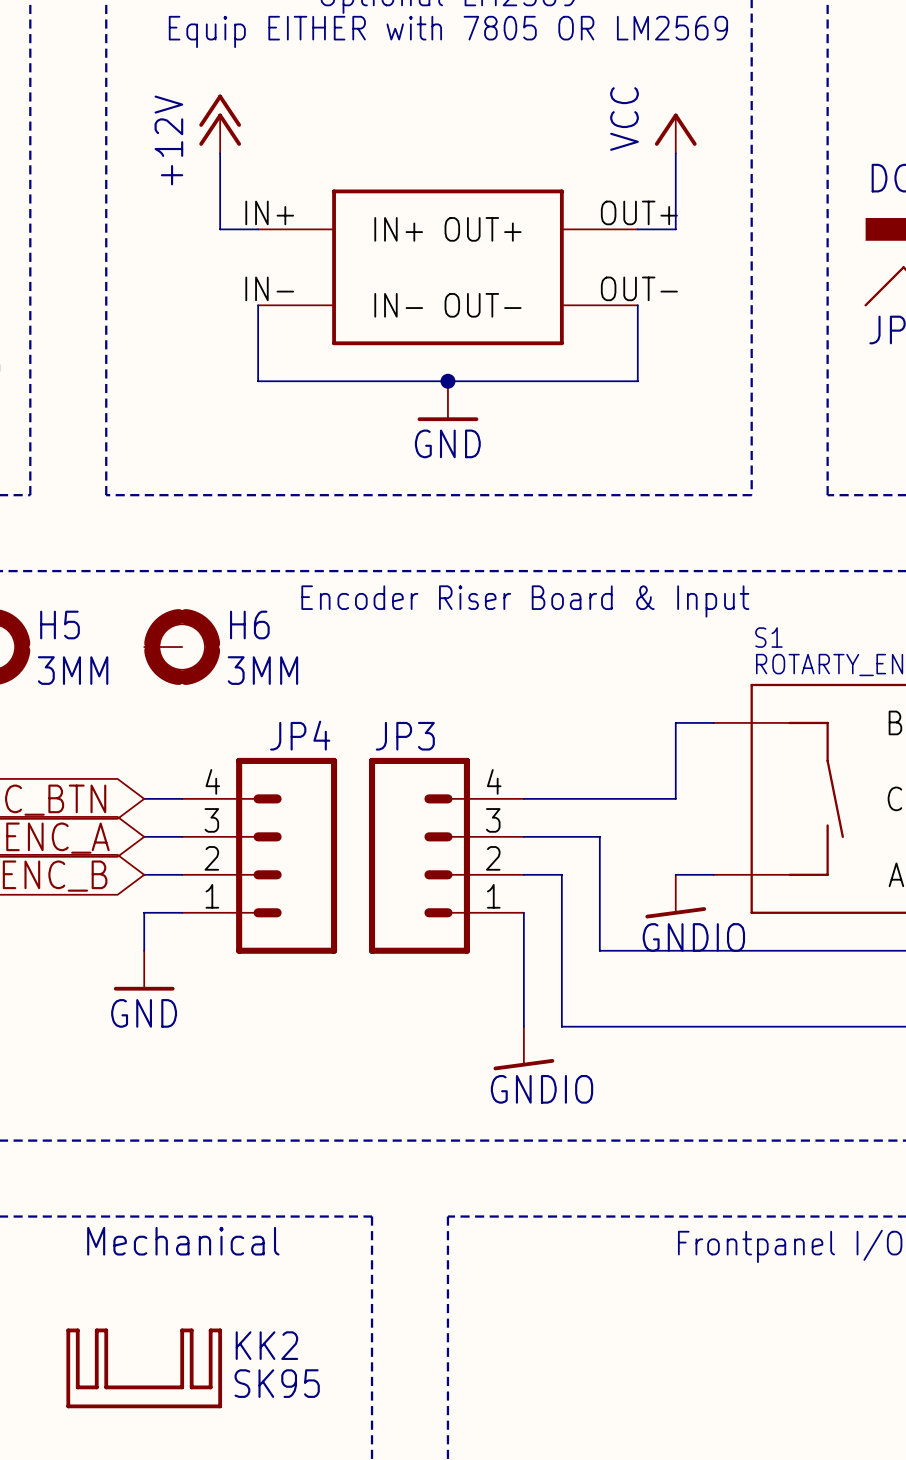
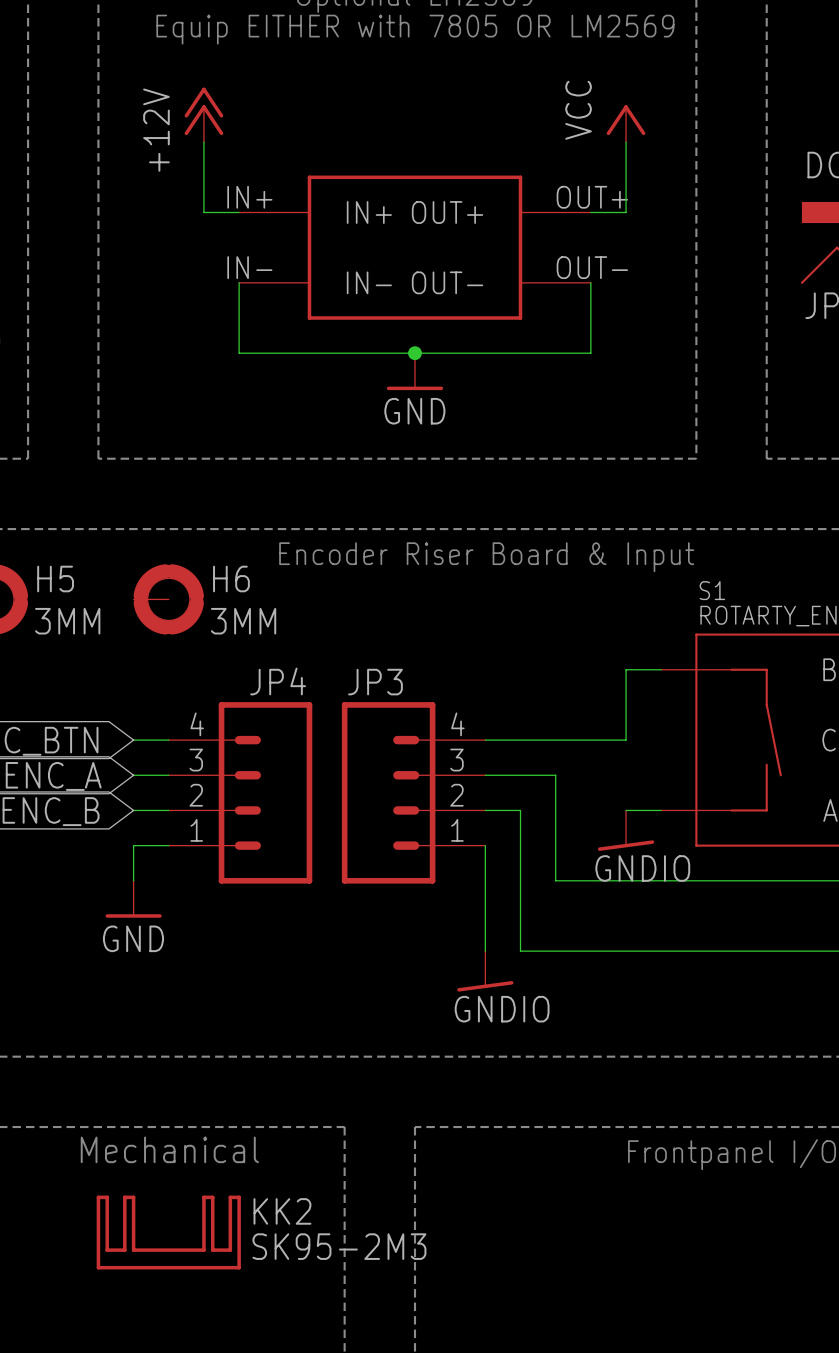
KK2 position: (144, 1368) -> (168, 1232)
KK2 value: SK95 (277, 1383) -> SK95-2M3 (339, 1246)

